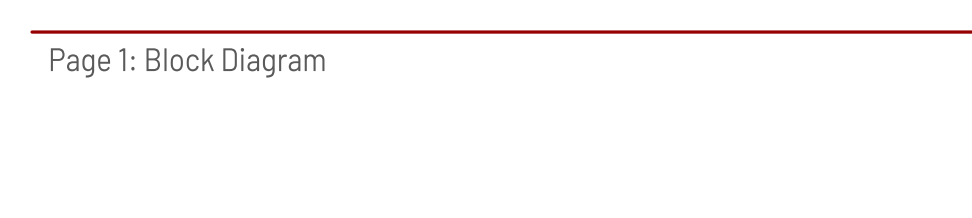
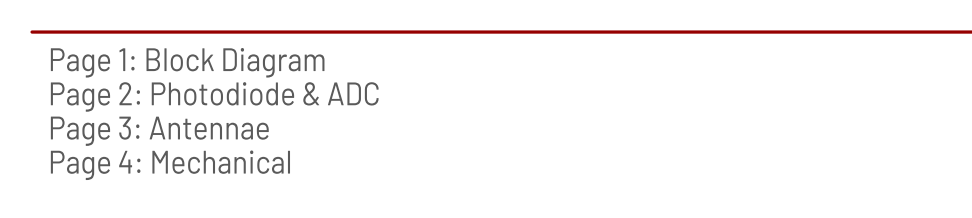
text: none -> Page 2: Photodiode & ADC (214, 96)
text: none -> Page 3: Antennae (159, 131)
text: none -> Page 4: Mechanical (170, 165)

